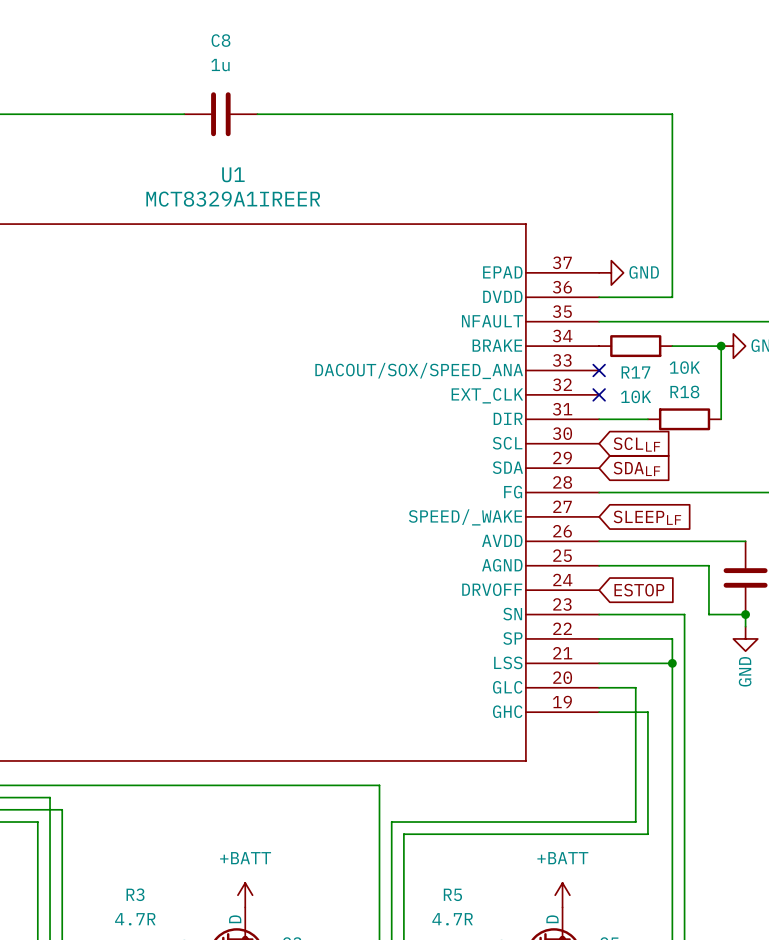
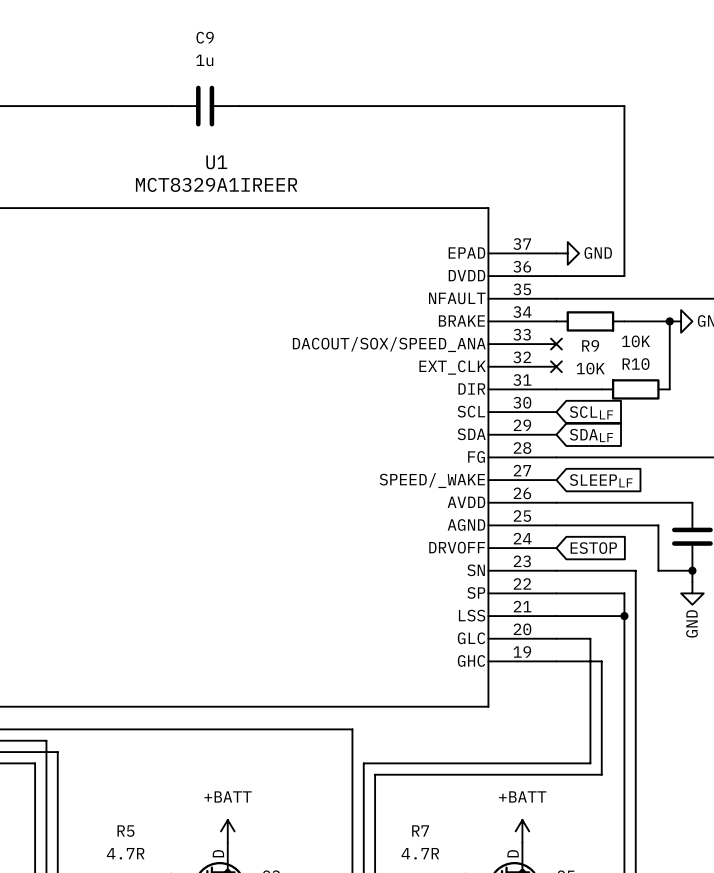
C8 name: C8 (220, 40) -> C9 (205, 37)
R17 name: R17 (635, 372) -> R9 (590, 345)
R18 name: R18 (684, 392) -> R10 (636, 364)
R3 name: R3 (135, 894) -> R5 (125, 831)
R5 name: R5 (452, 894) -> R7 (420, 830)

